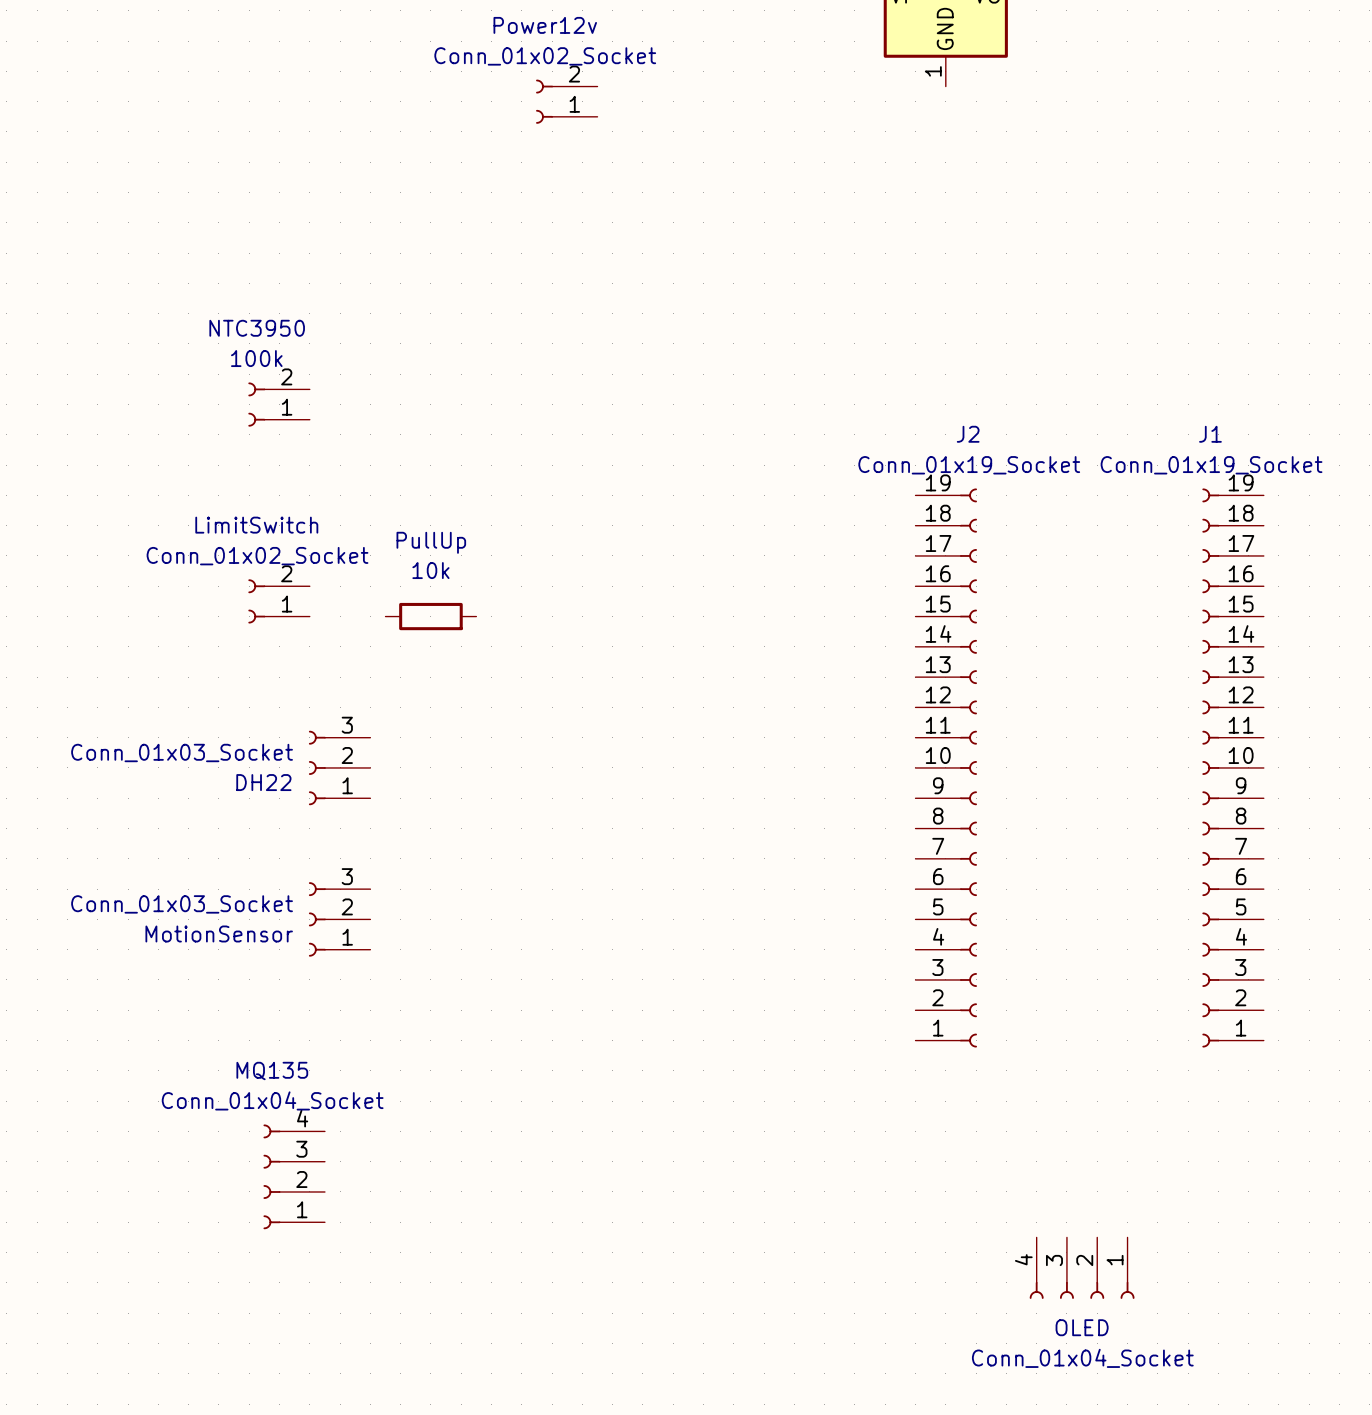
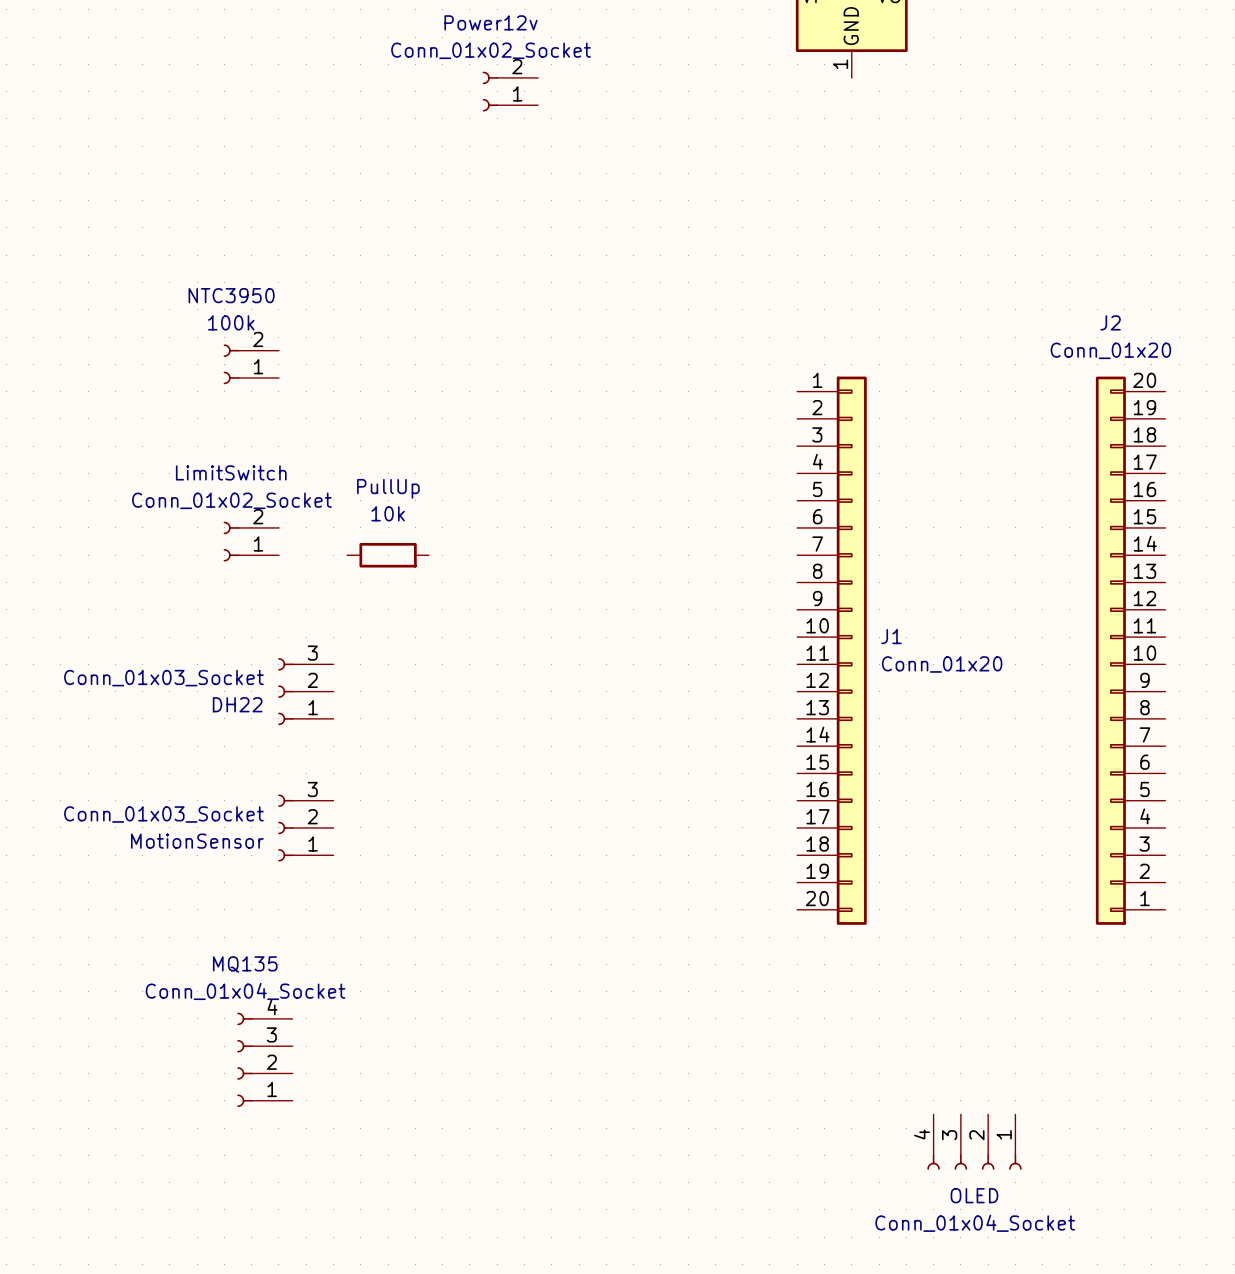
J2 name position: J2 (968, 434) -> J2 (1110, 322)
J1 name position: J1 (1210, 434) -> J1 (891, 636)
J2 value: Conn_01x19_Socket (969, 465) -> Conn_01x20 (1110, 350)
J1 value: Conn_01x19_Socket (1211, 465) -> Conn_01x20 (942, 664)
J2 symbol: [915, 488, 978, 1048] -> [1095, 376, 1166, 925]
J1 symbol: [1202, 488, 1264, 1048] -> [797, 376, 867, 925]

